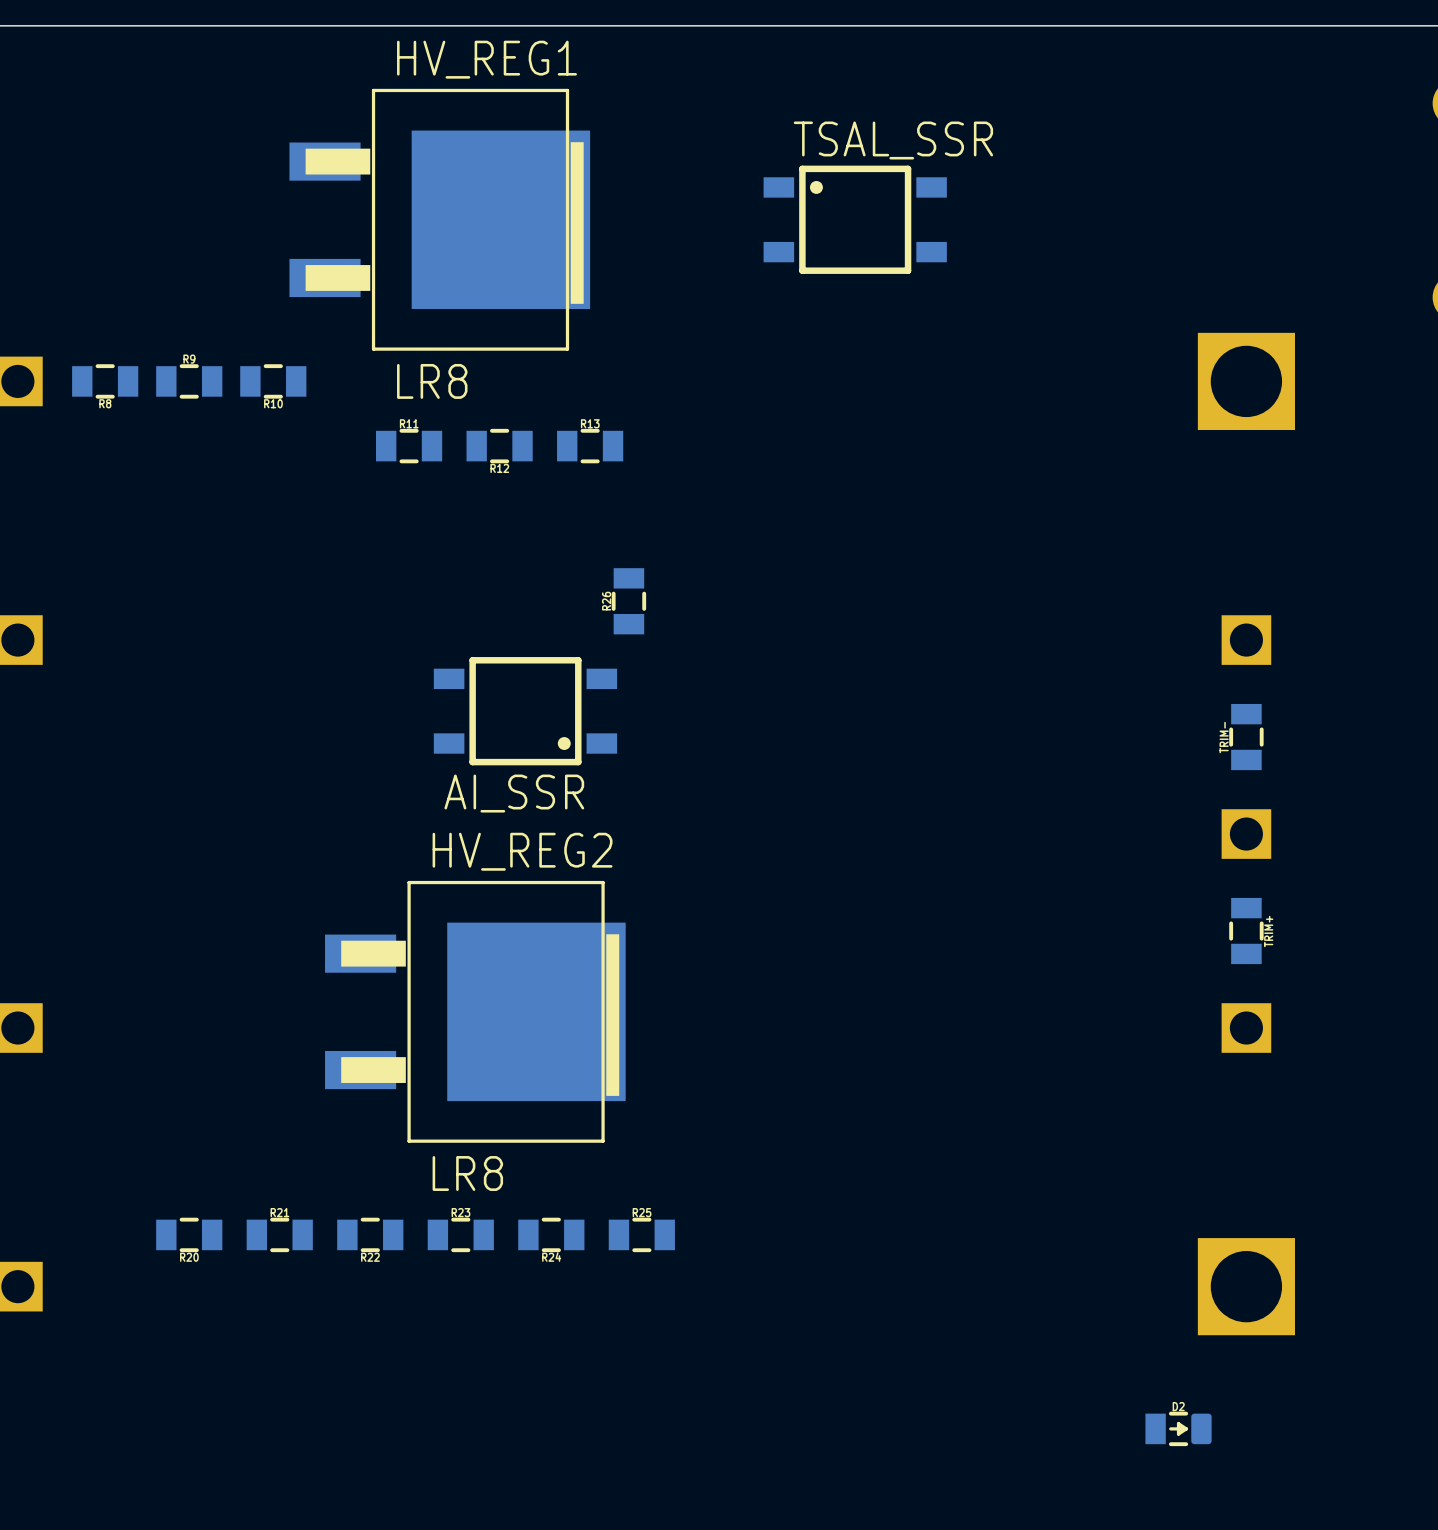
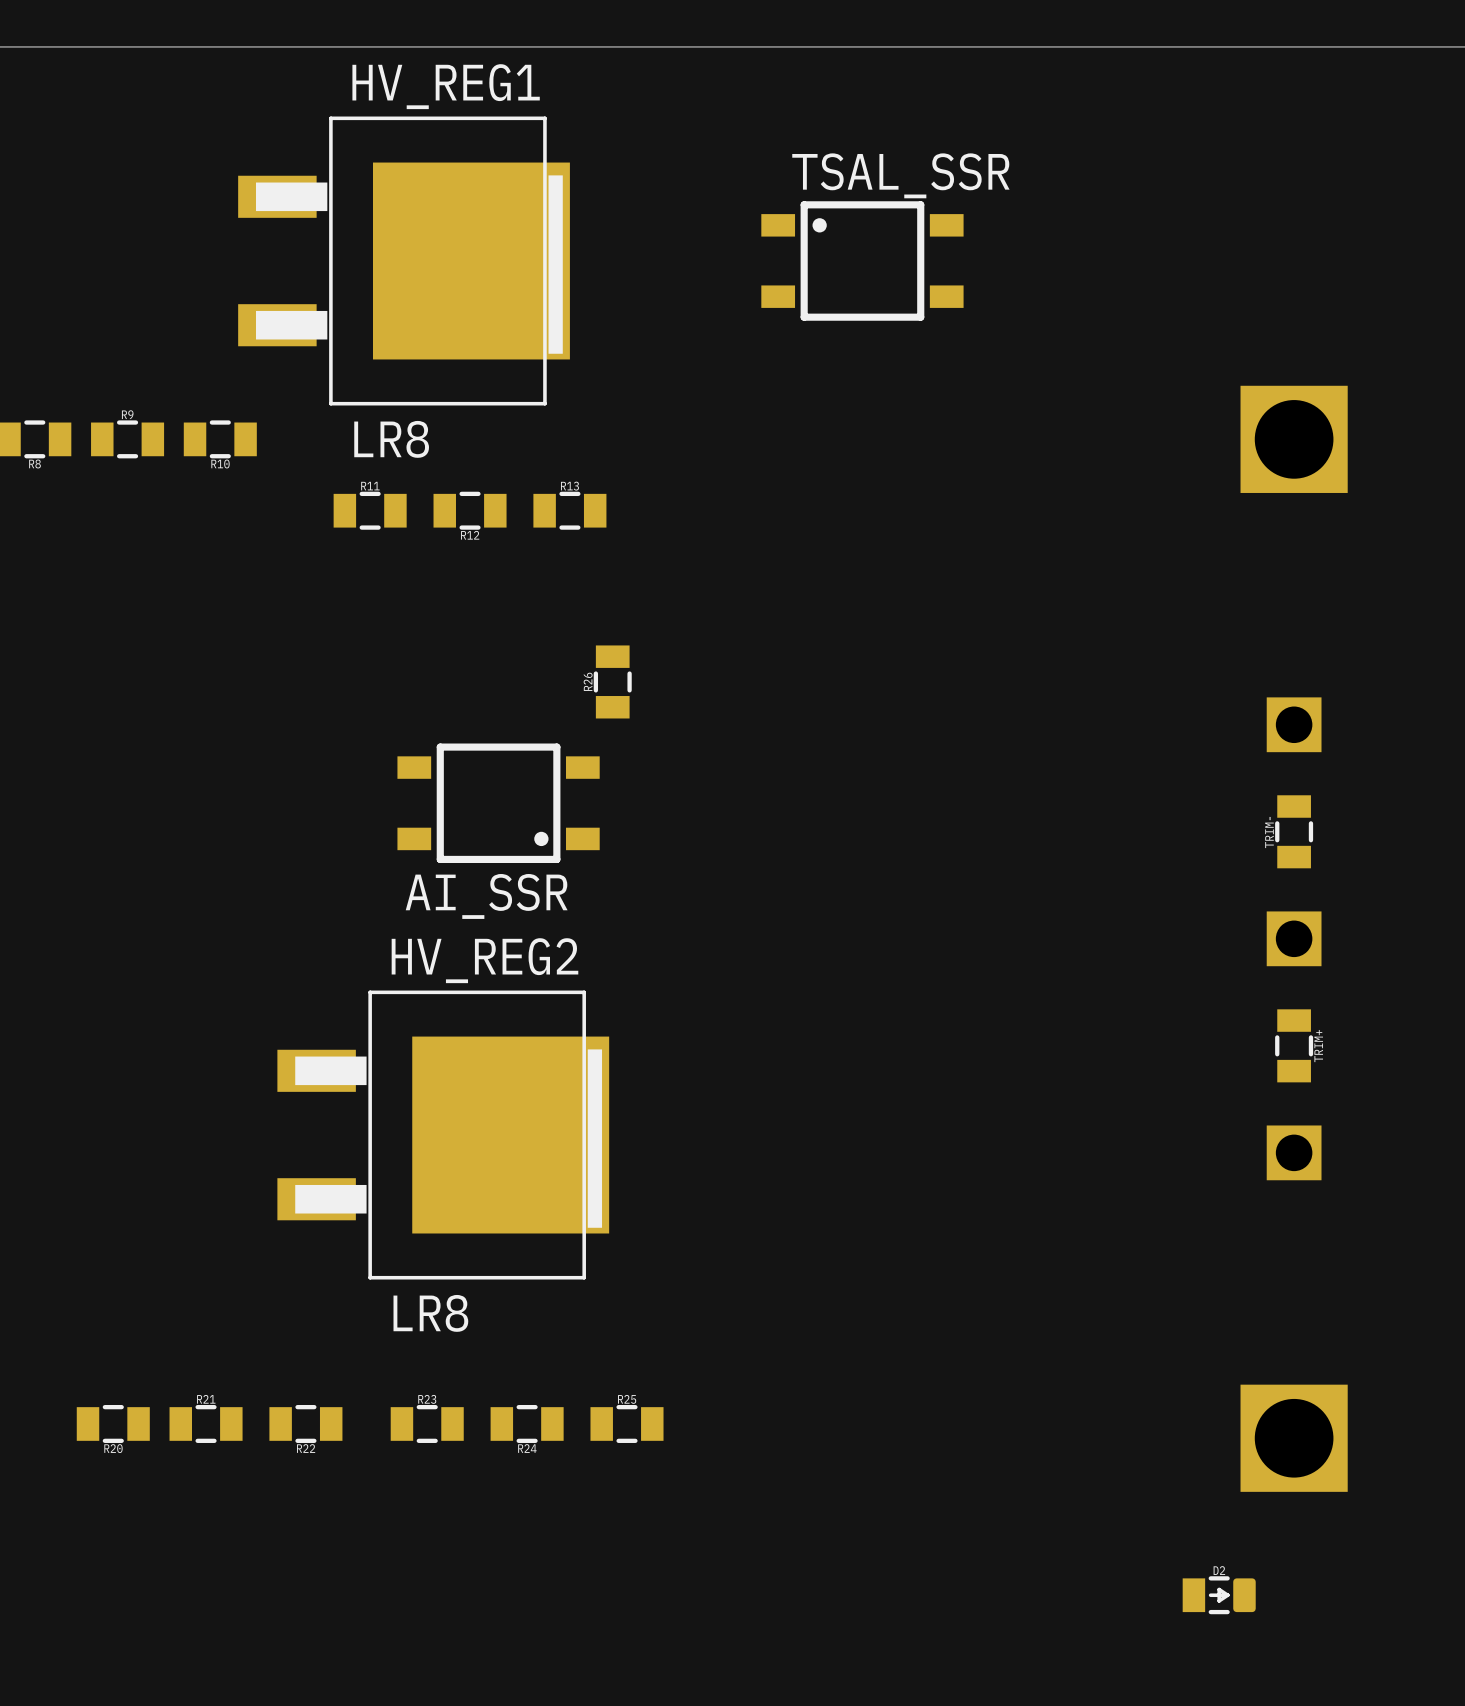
R20 position: (189, 1234) -> (113, 1423)
R21 position: (279, 1234) -> (206, 1423)
R22 position: (370, 1234) -> (305, 1423)
R23 position: (460, 1234) -> (427, 1423)
R24 position: (551, 1234) -> (527, 1423)
R25 position: (641, 1234) -> (627, 1423)

